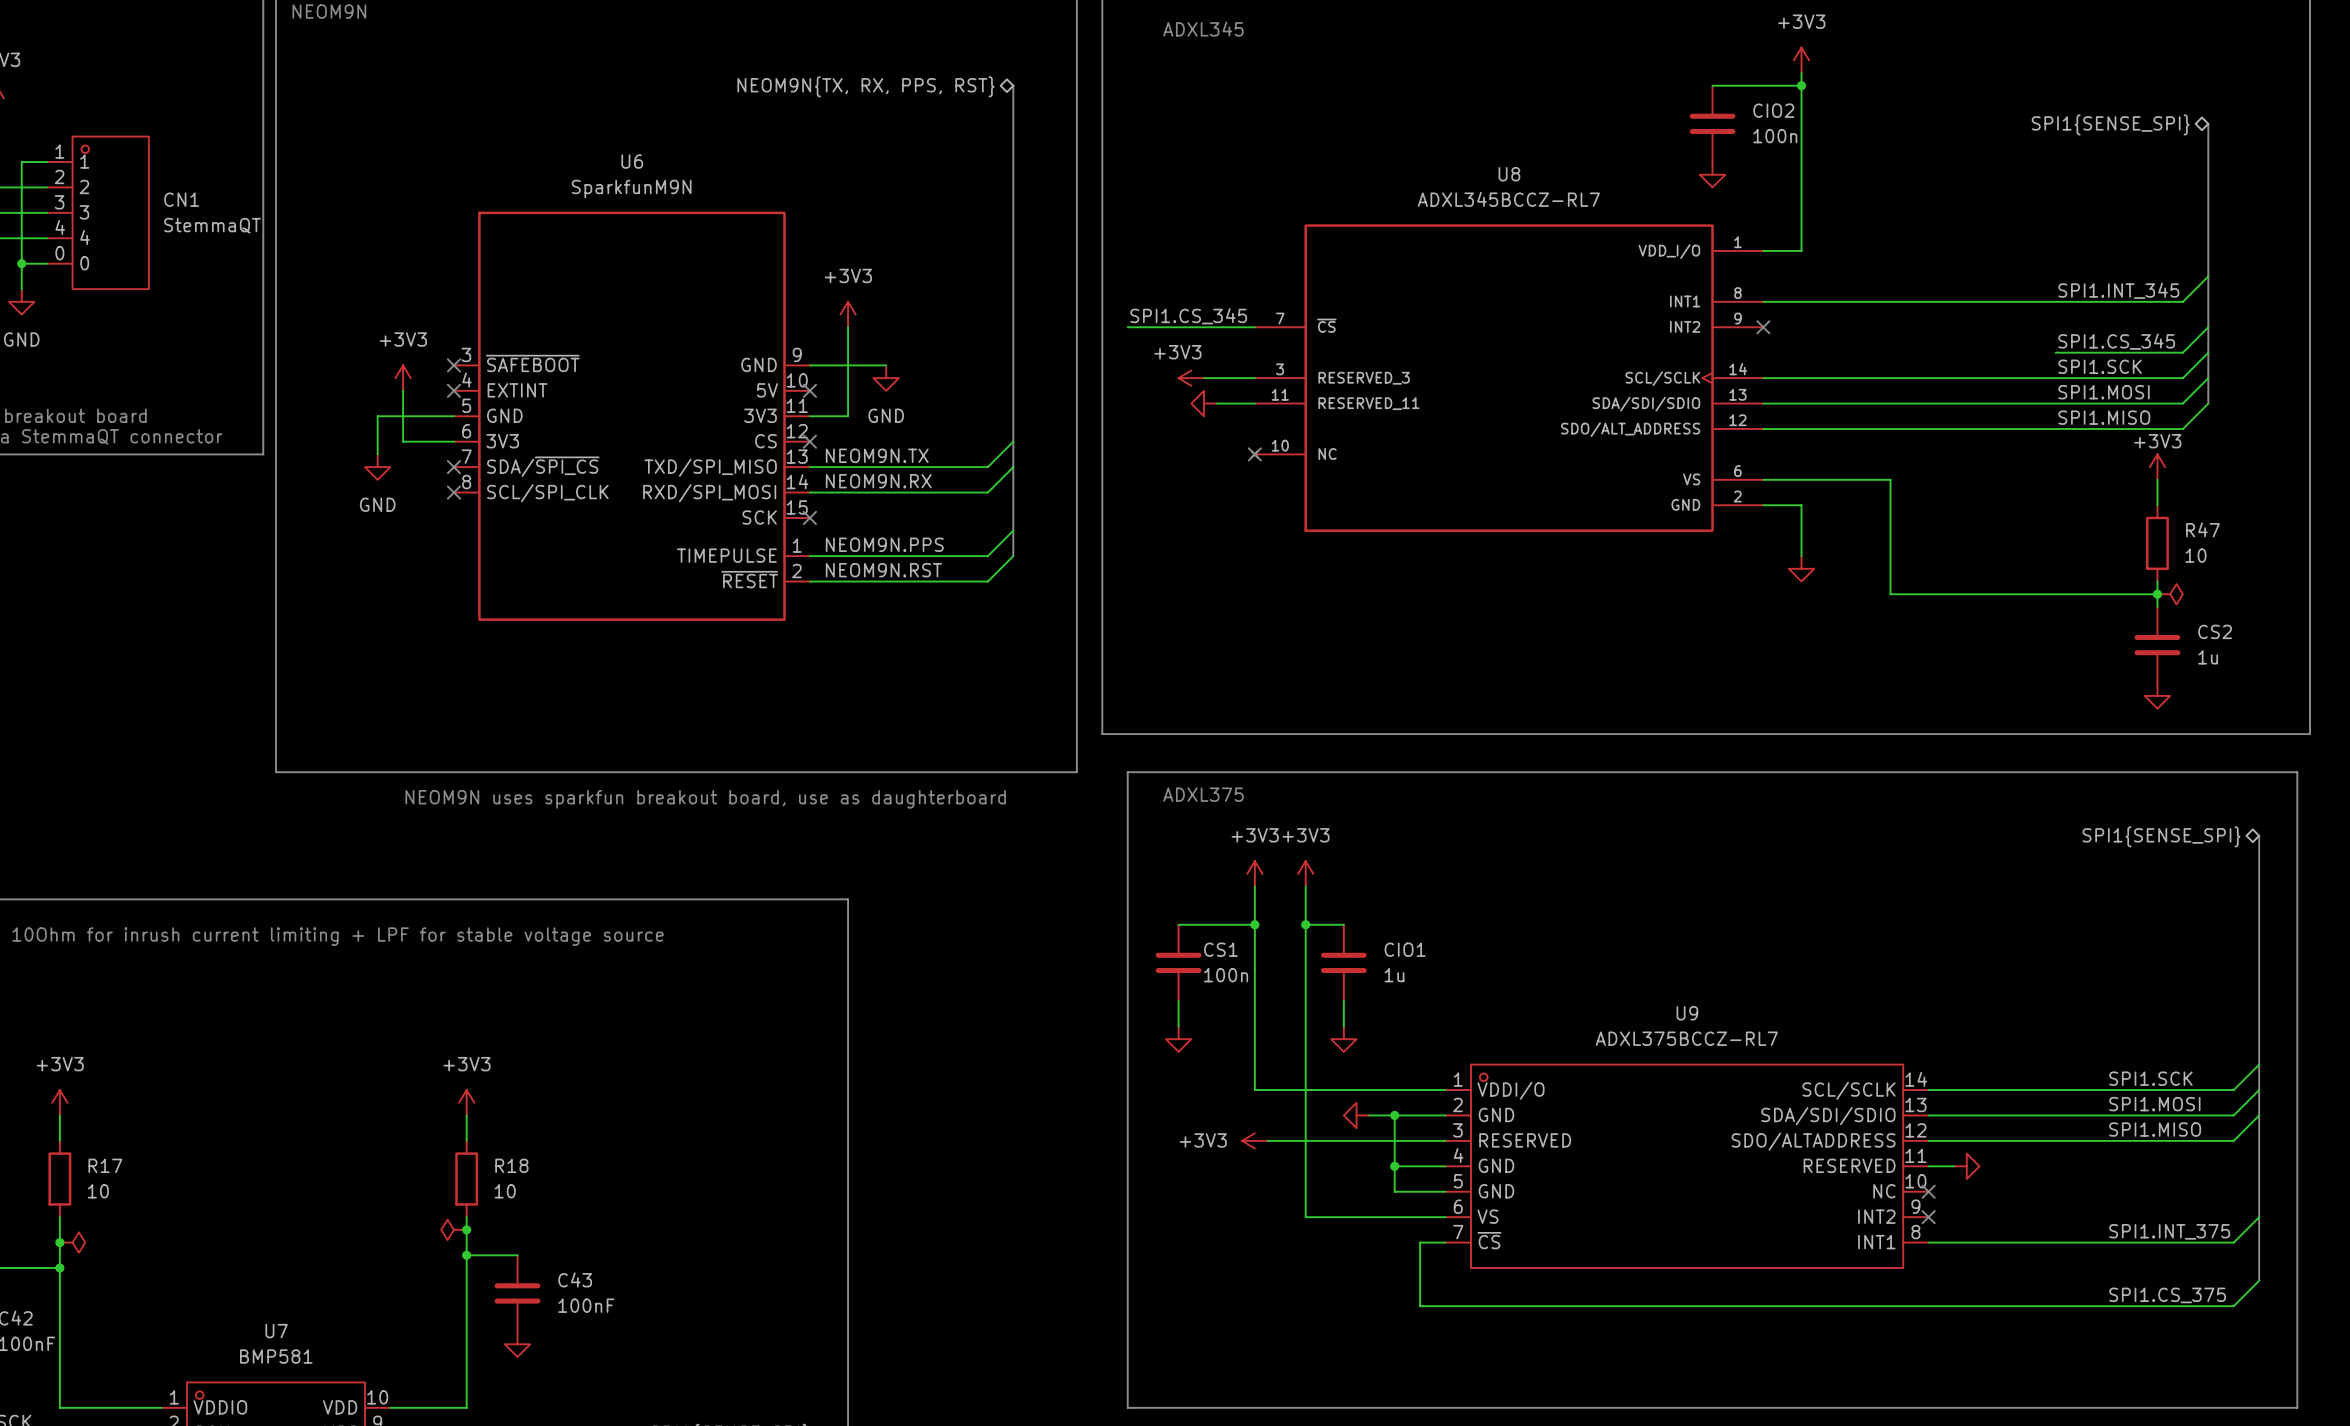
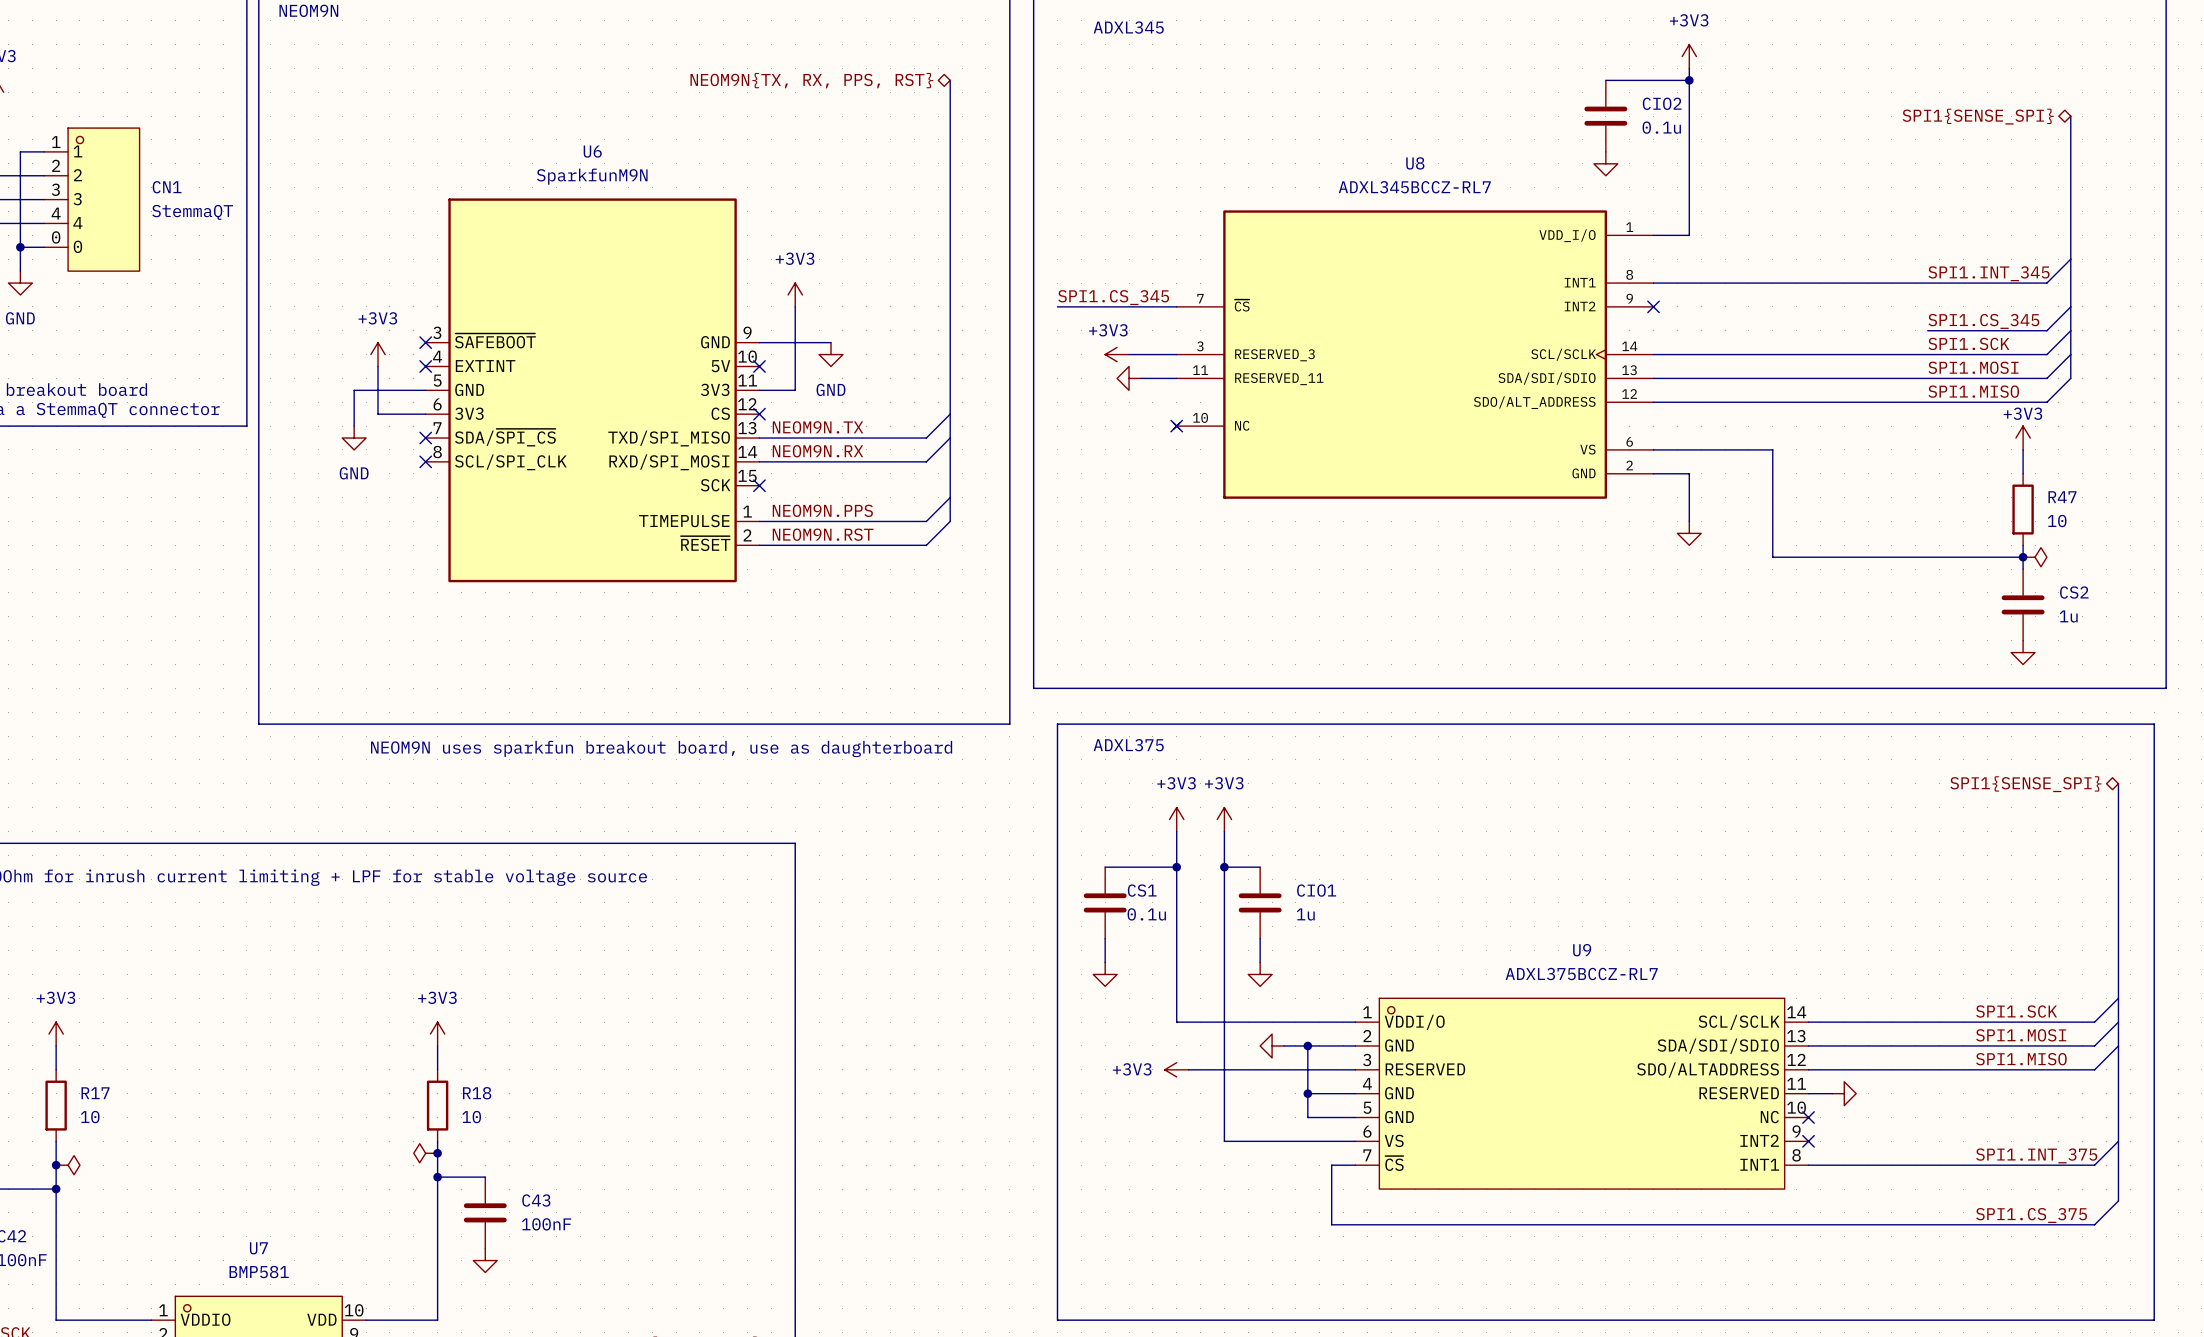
CIO2 value: 100n (1775, 136) -> 0.1u (1661, 127)
CS1 value: 100n (1226, 975) -> 0.1u (1146, 914)

